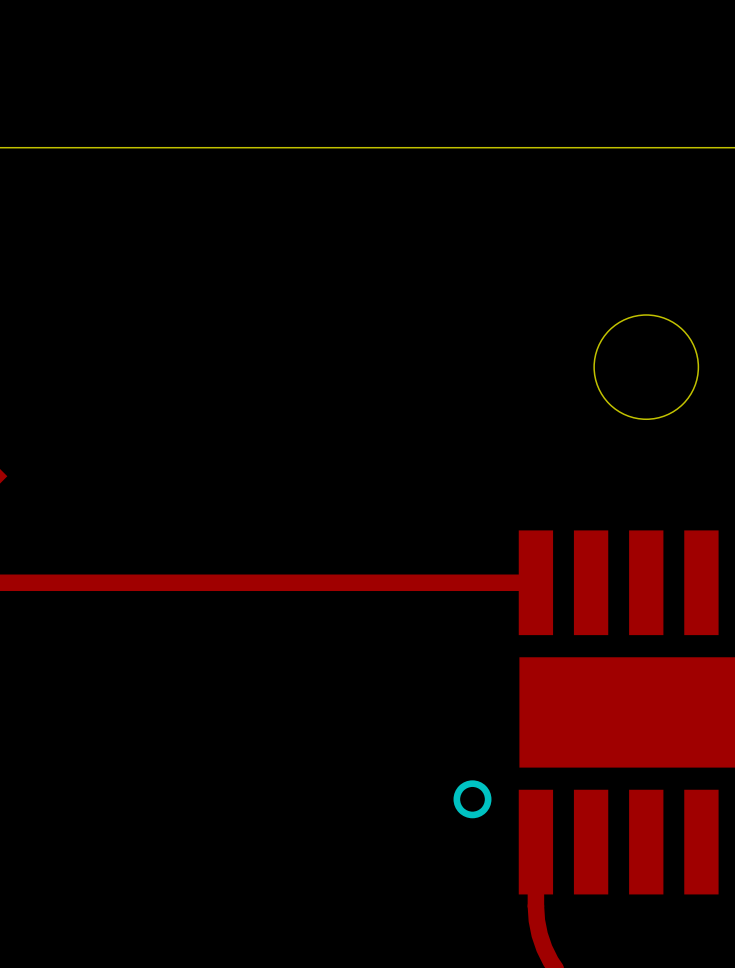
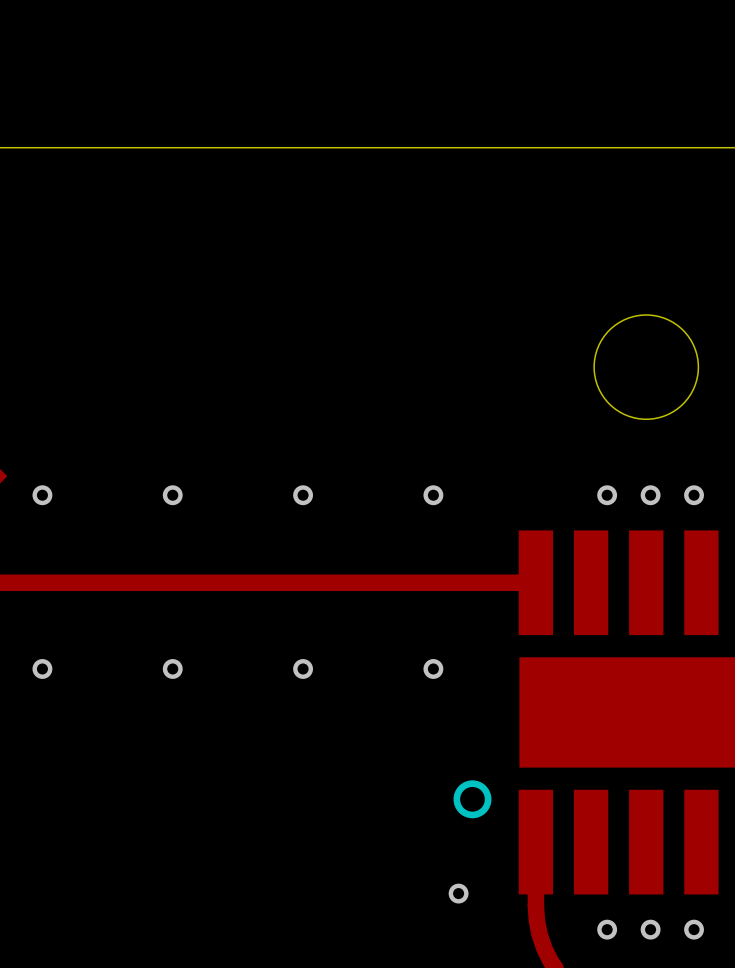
via: none -> (42, 495)
via: none -> (172, 495)
via: none -> (303, 495)
via: none -> (433, 495)
via: none -> (607, 495)
via: none -> (650, 495)
via: none -> (694, 495)
via: none -> (42, 668)
via: none -> (172, 668)
via: none -> (303, 668)
via: none -> (433, 668)
via: none -> (458, 893)
via: none -> (607, 929)
via: none -> (650, 929)
via: none -> (694, 929)

